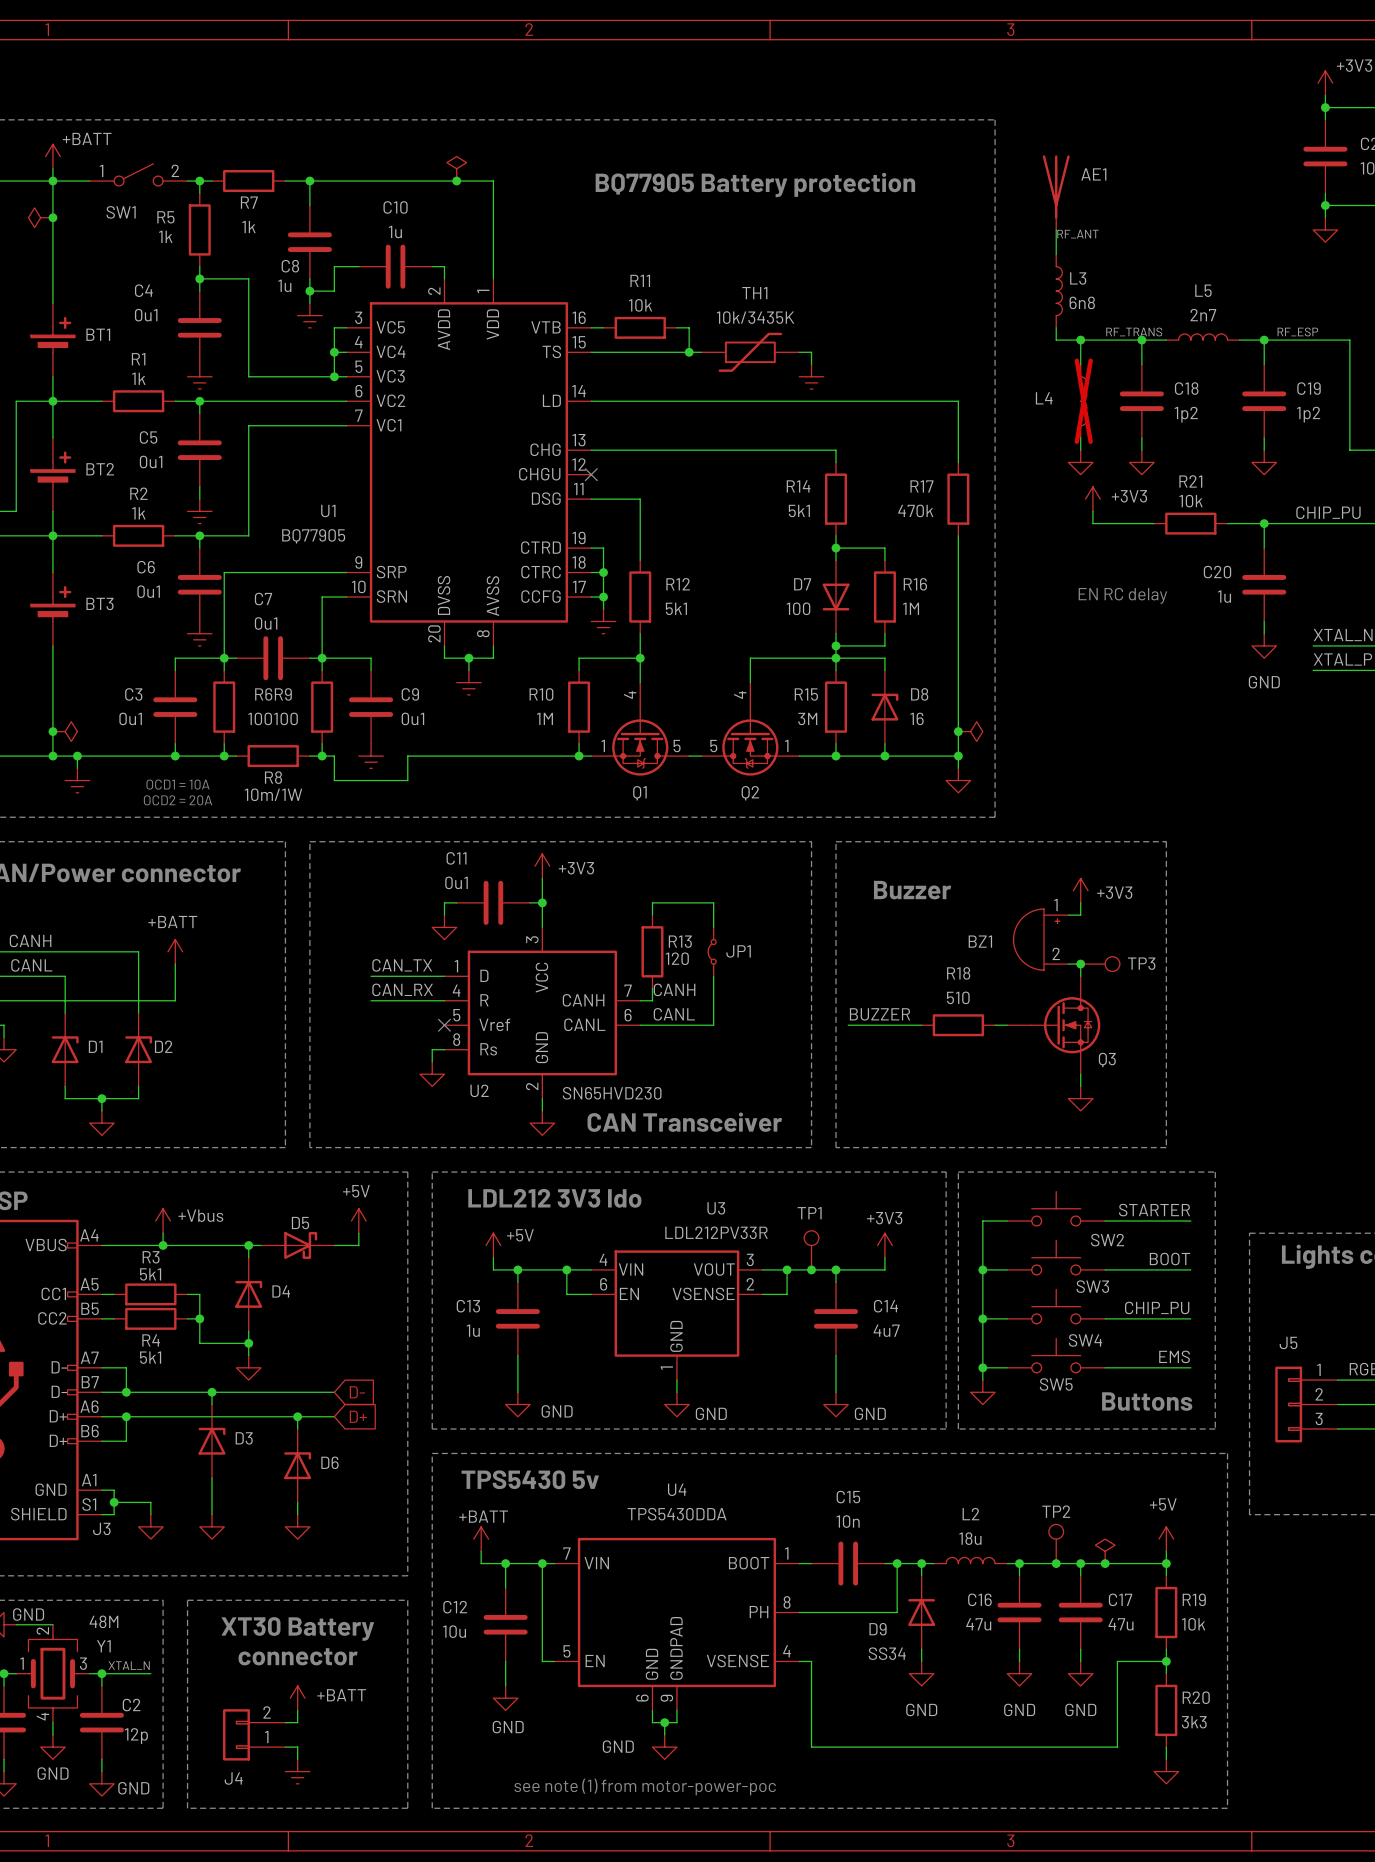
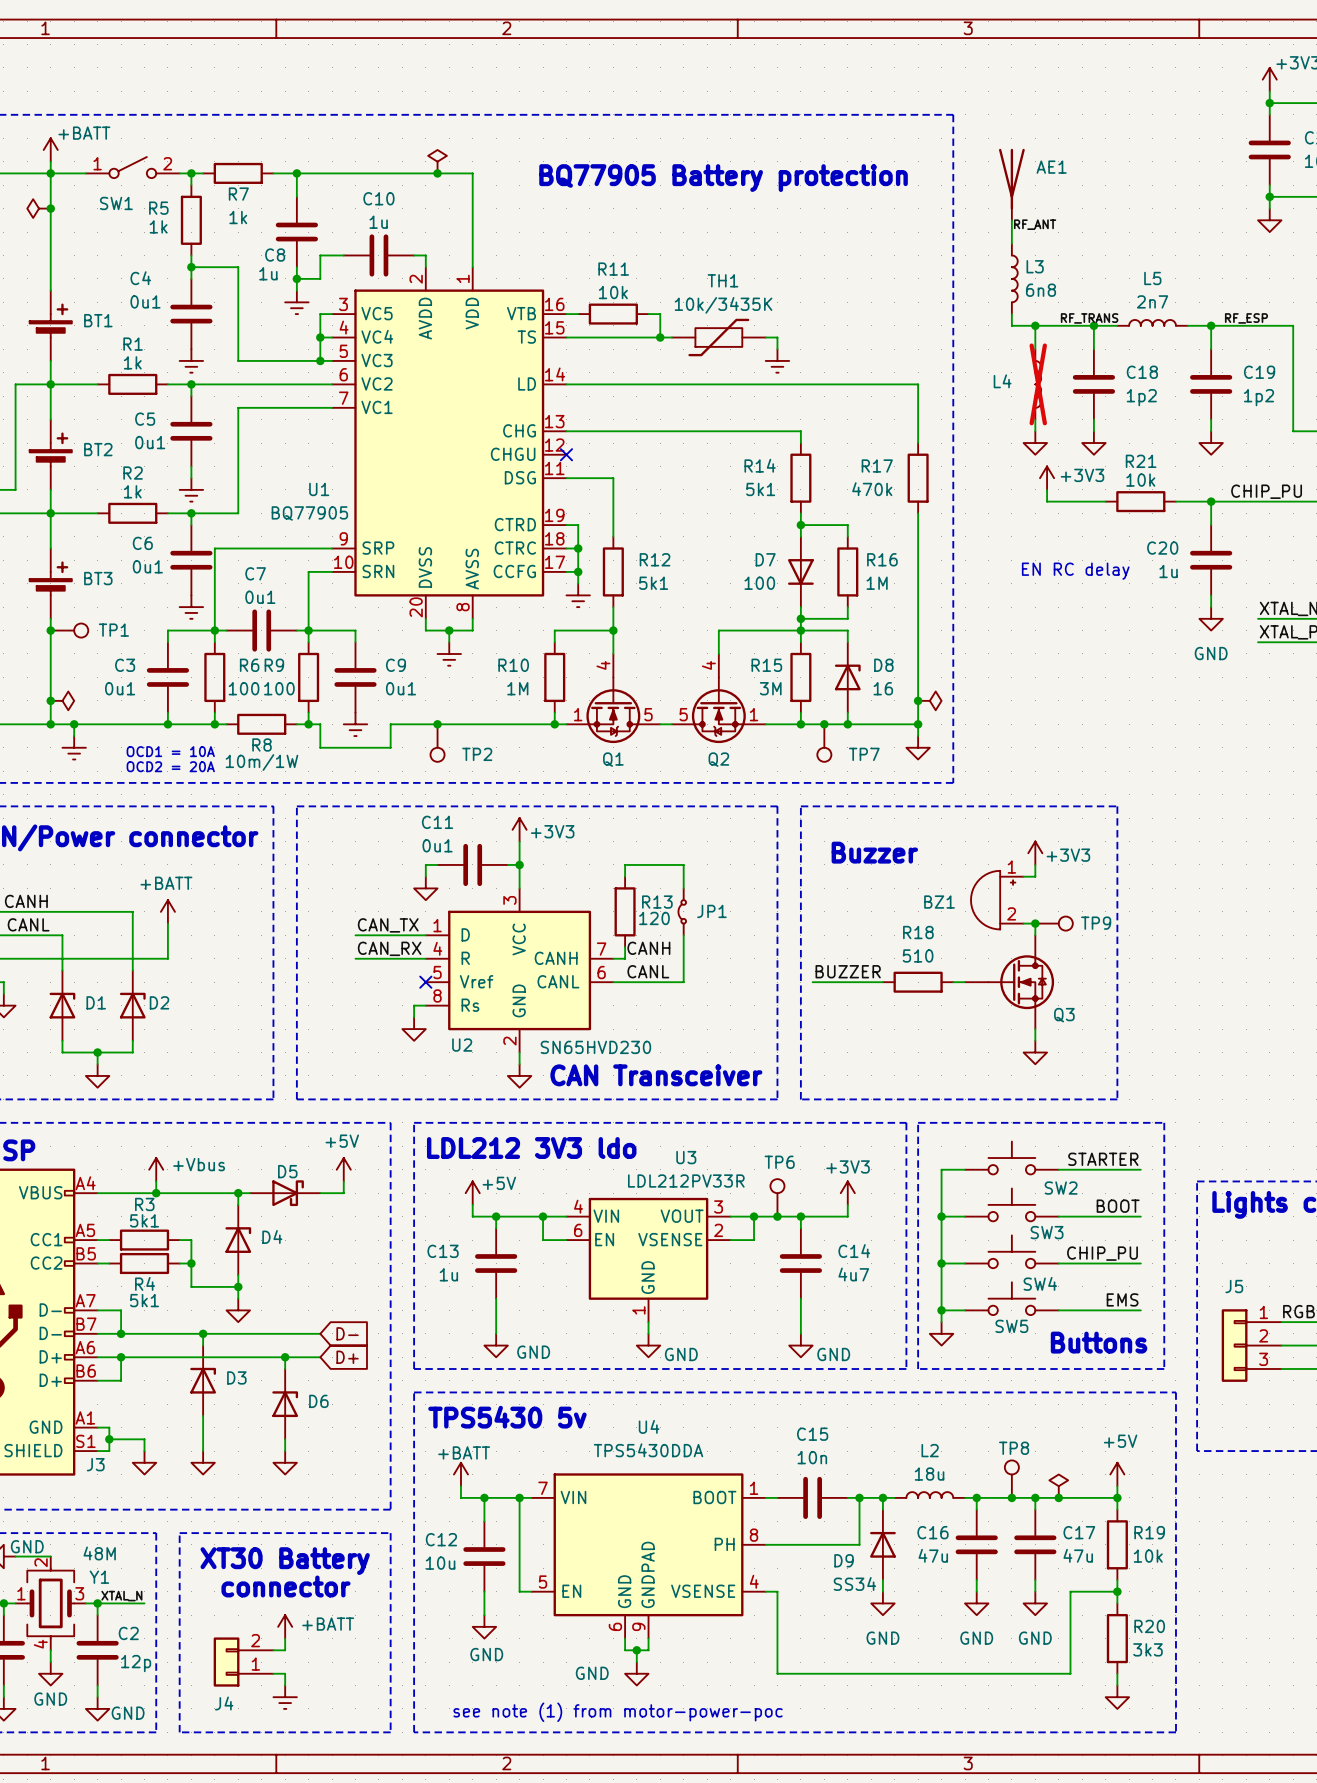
junction: none -> (50, 630)
TP1: none -> (69, 630)
junction: none -> (437, 724)
junction: none -> (824, 724)
TP2: none -> (437, 743)
TP7: none -> (824, 743)
TP3 name: TP3 (1141, 963) -> TP9 (1096, 923)
TP1 name: TP1 (809, 1213) -> TP6 (779, 1162)
TP2 name: TP2 (1056, 1511) -> TP8 (1014, 1448)

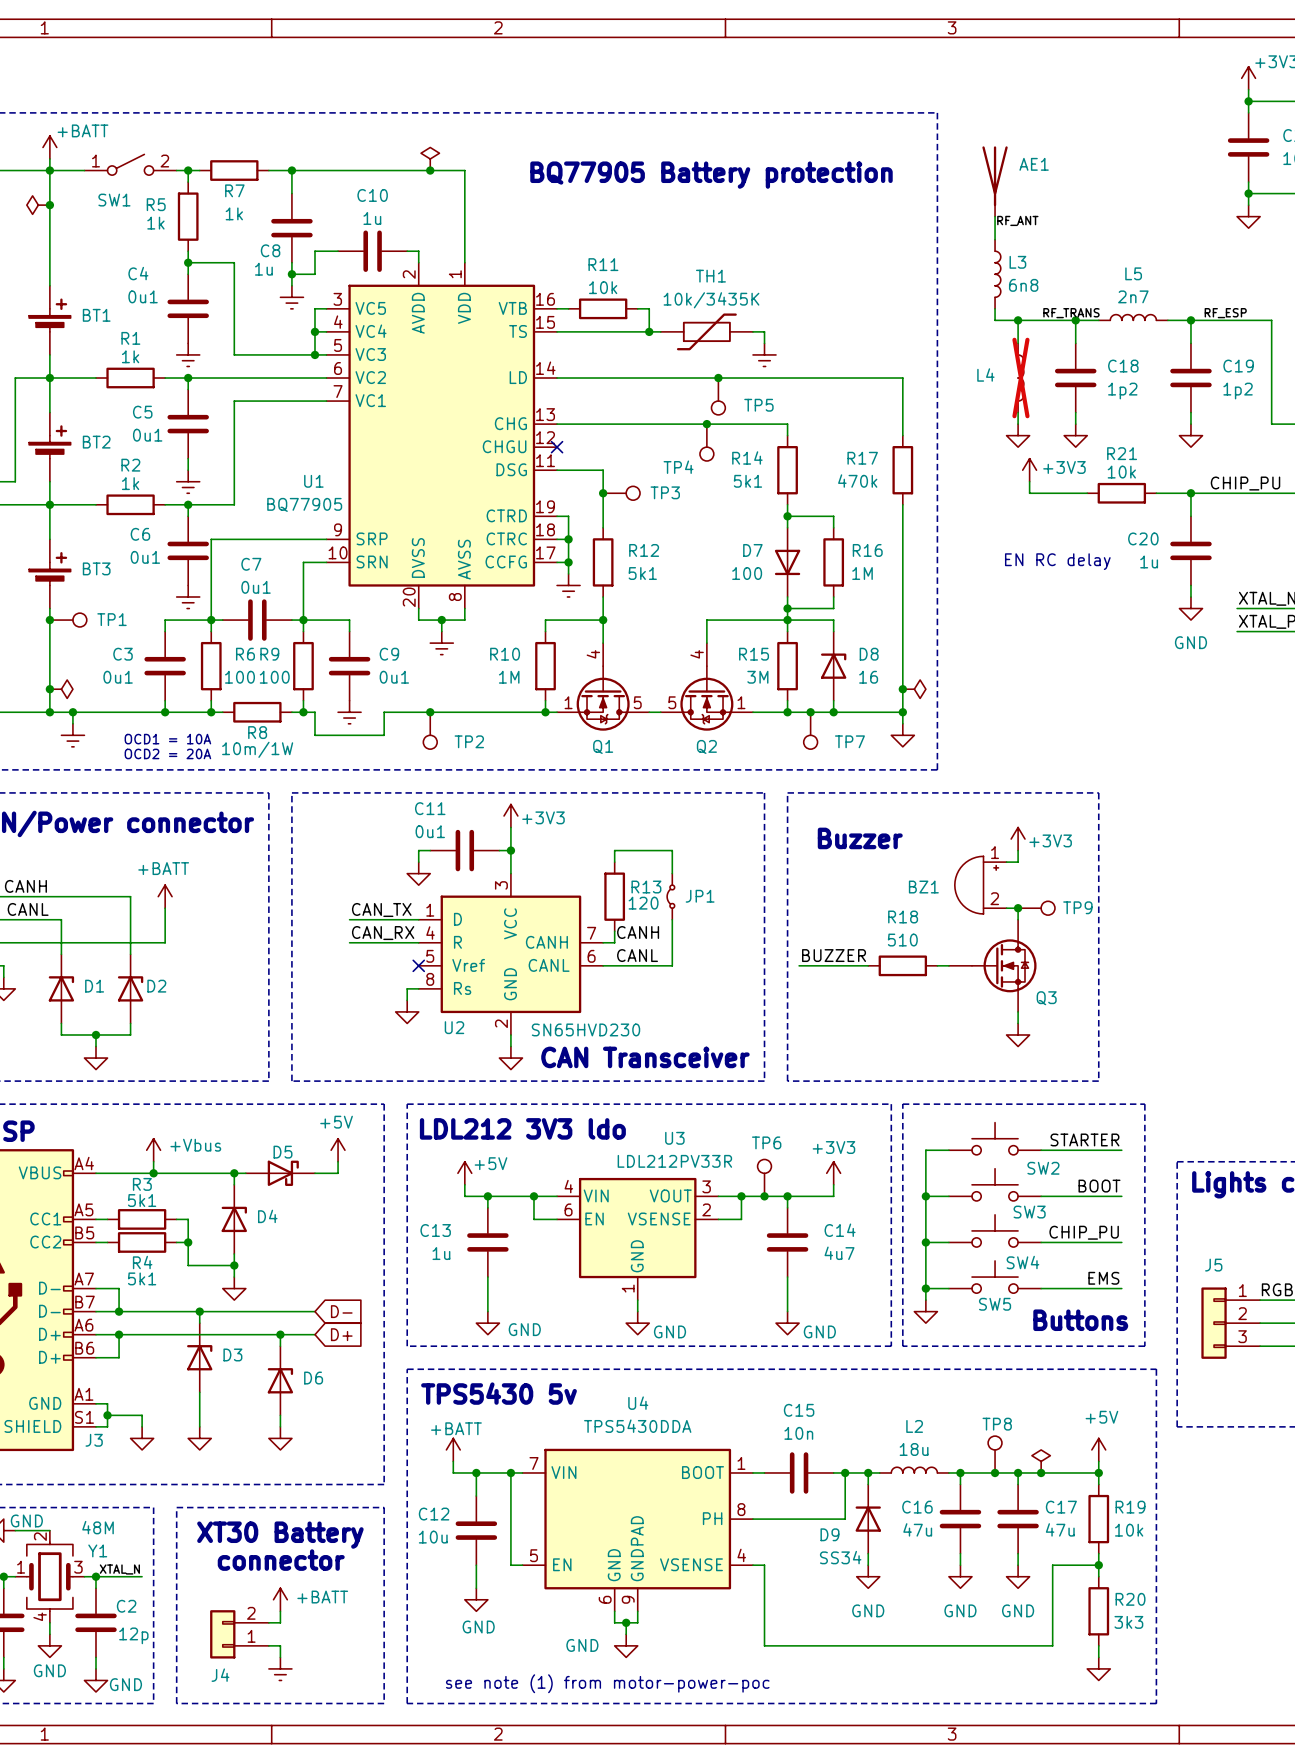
junction: none -> (718, 378)
TP5: none -> (718, 396)
junction: none -> (706, 424)
TP4: none -> (706, 442)
junction: none -> (603, 493)
TP3: none -> (621, 493)

